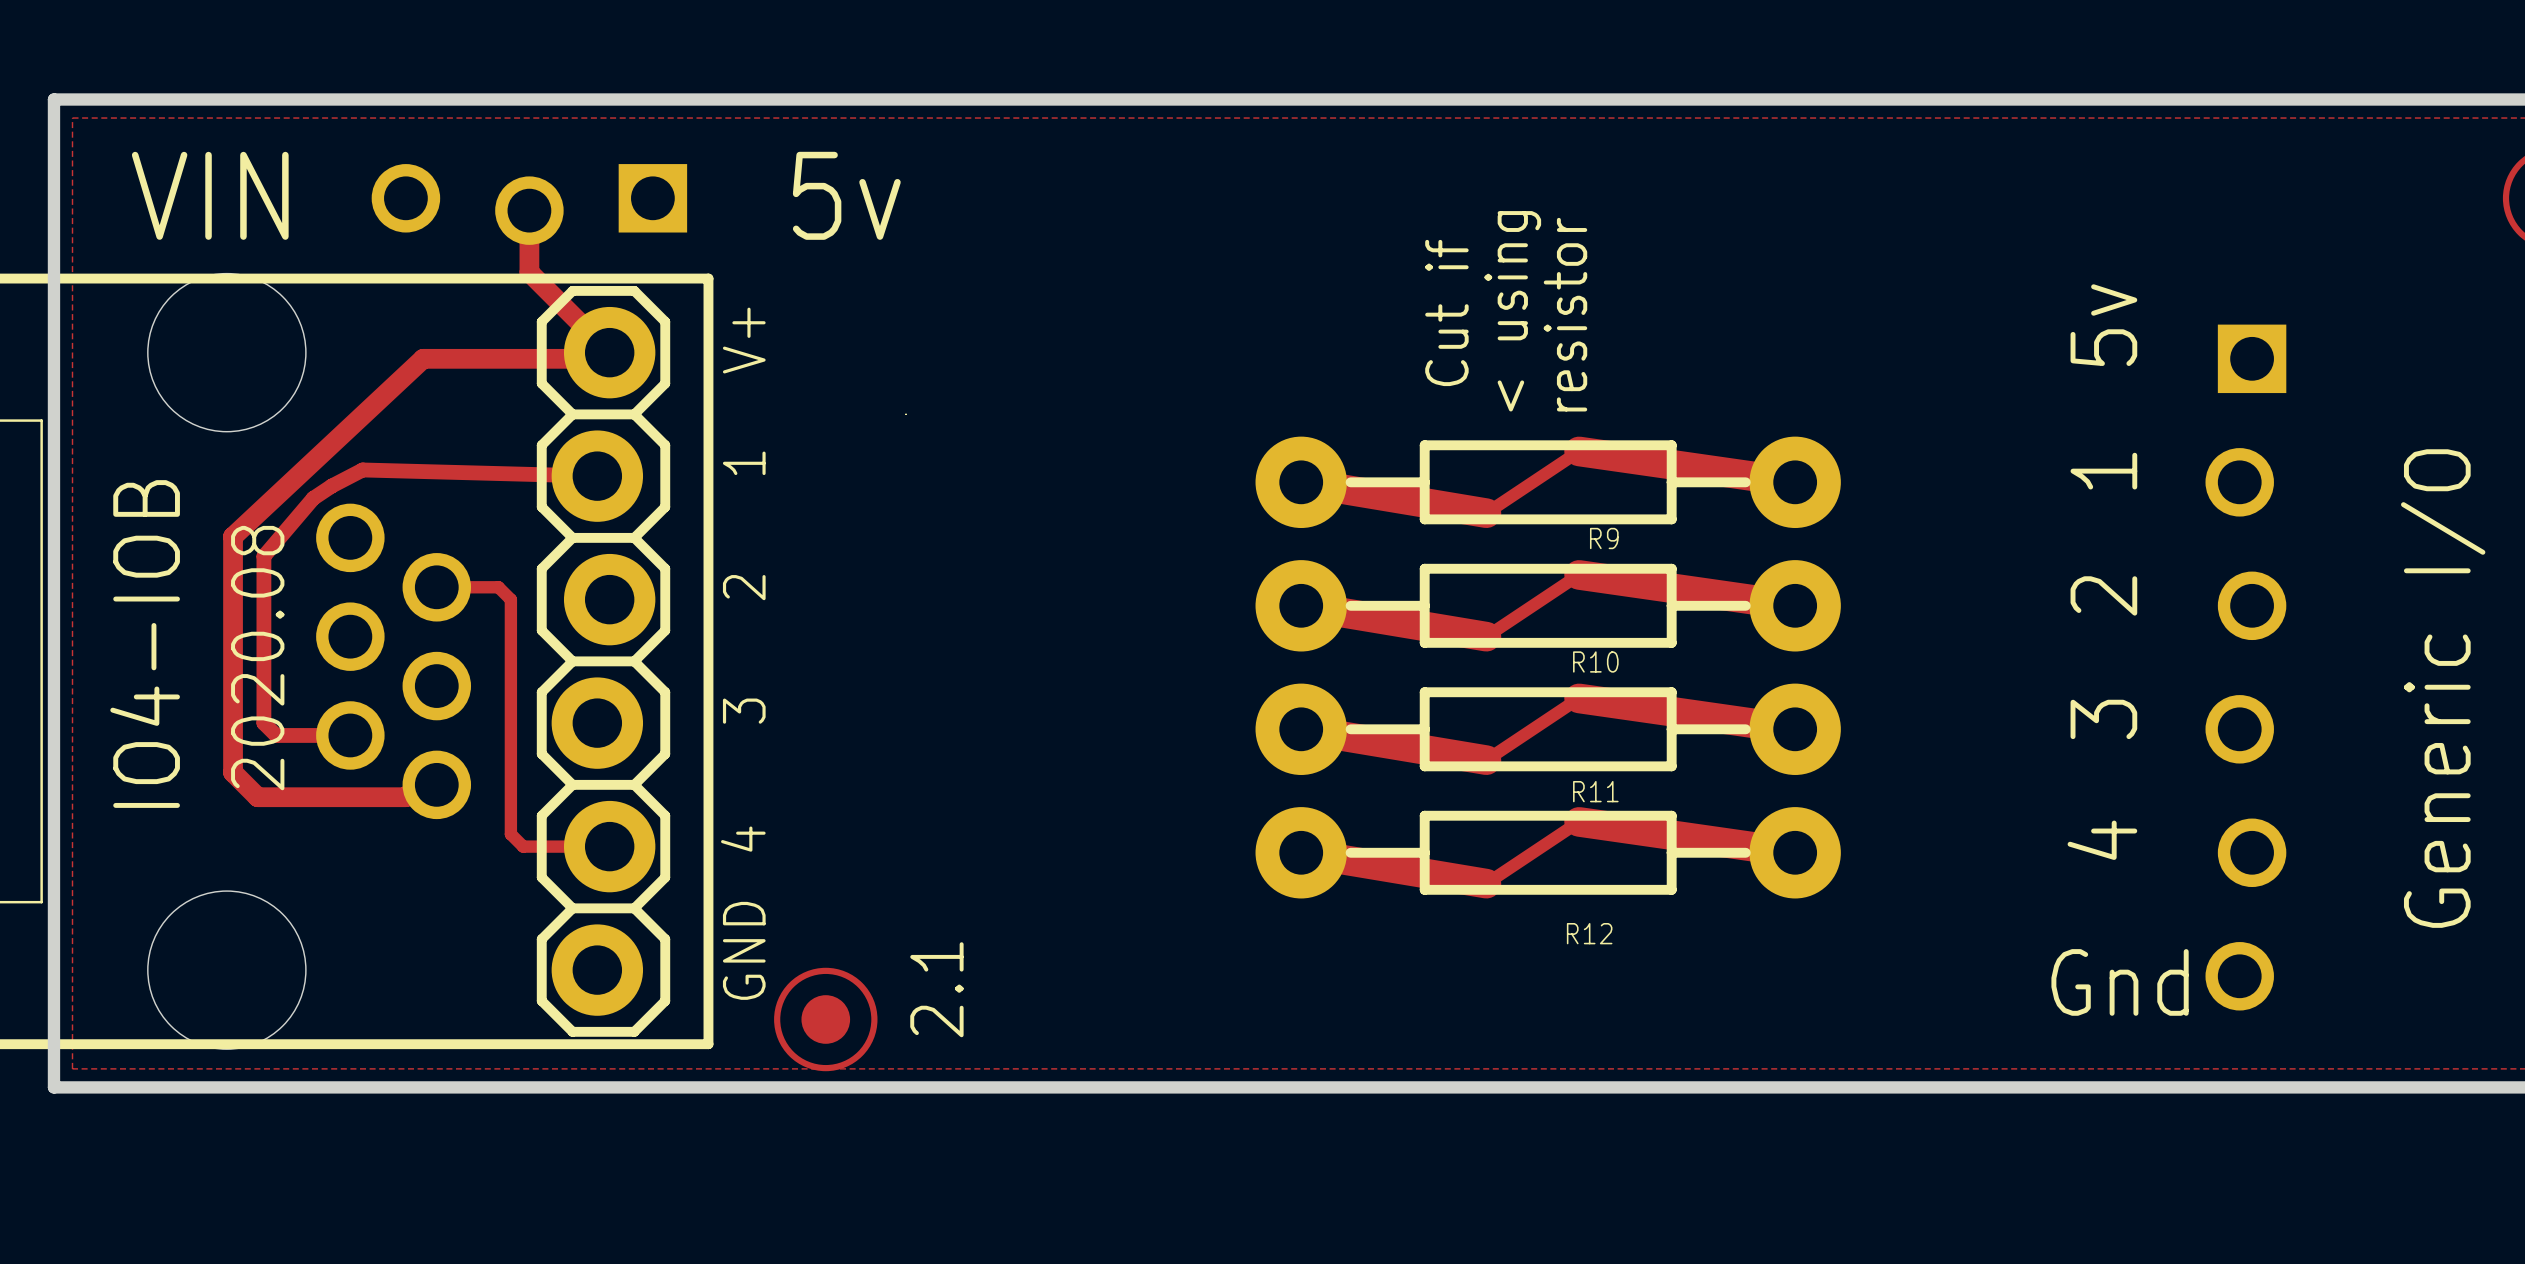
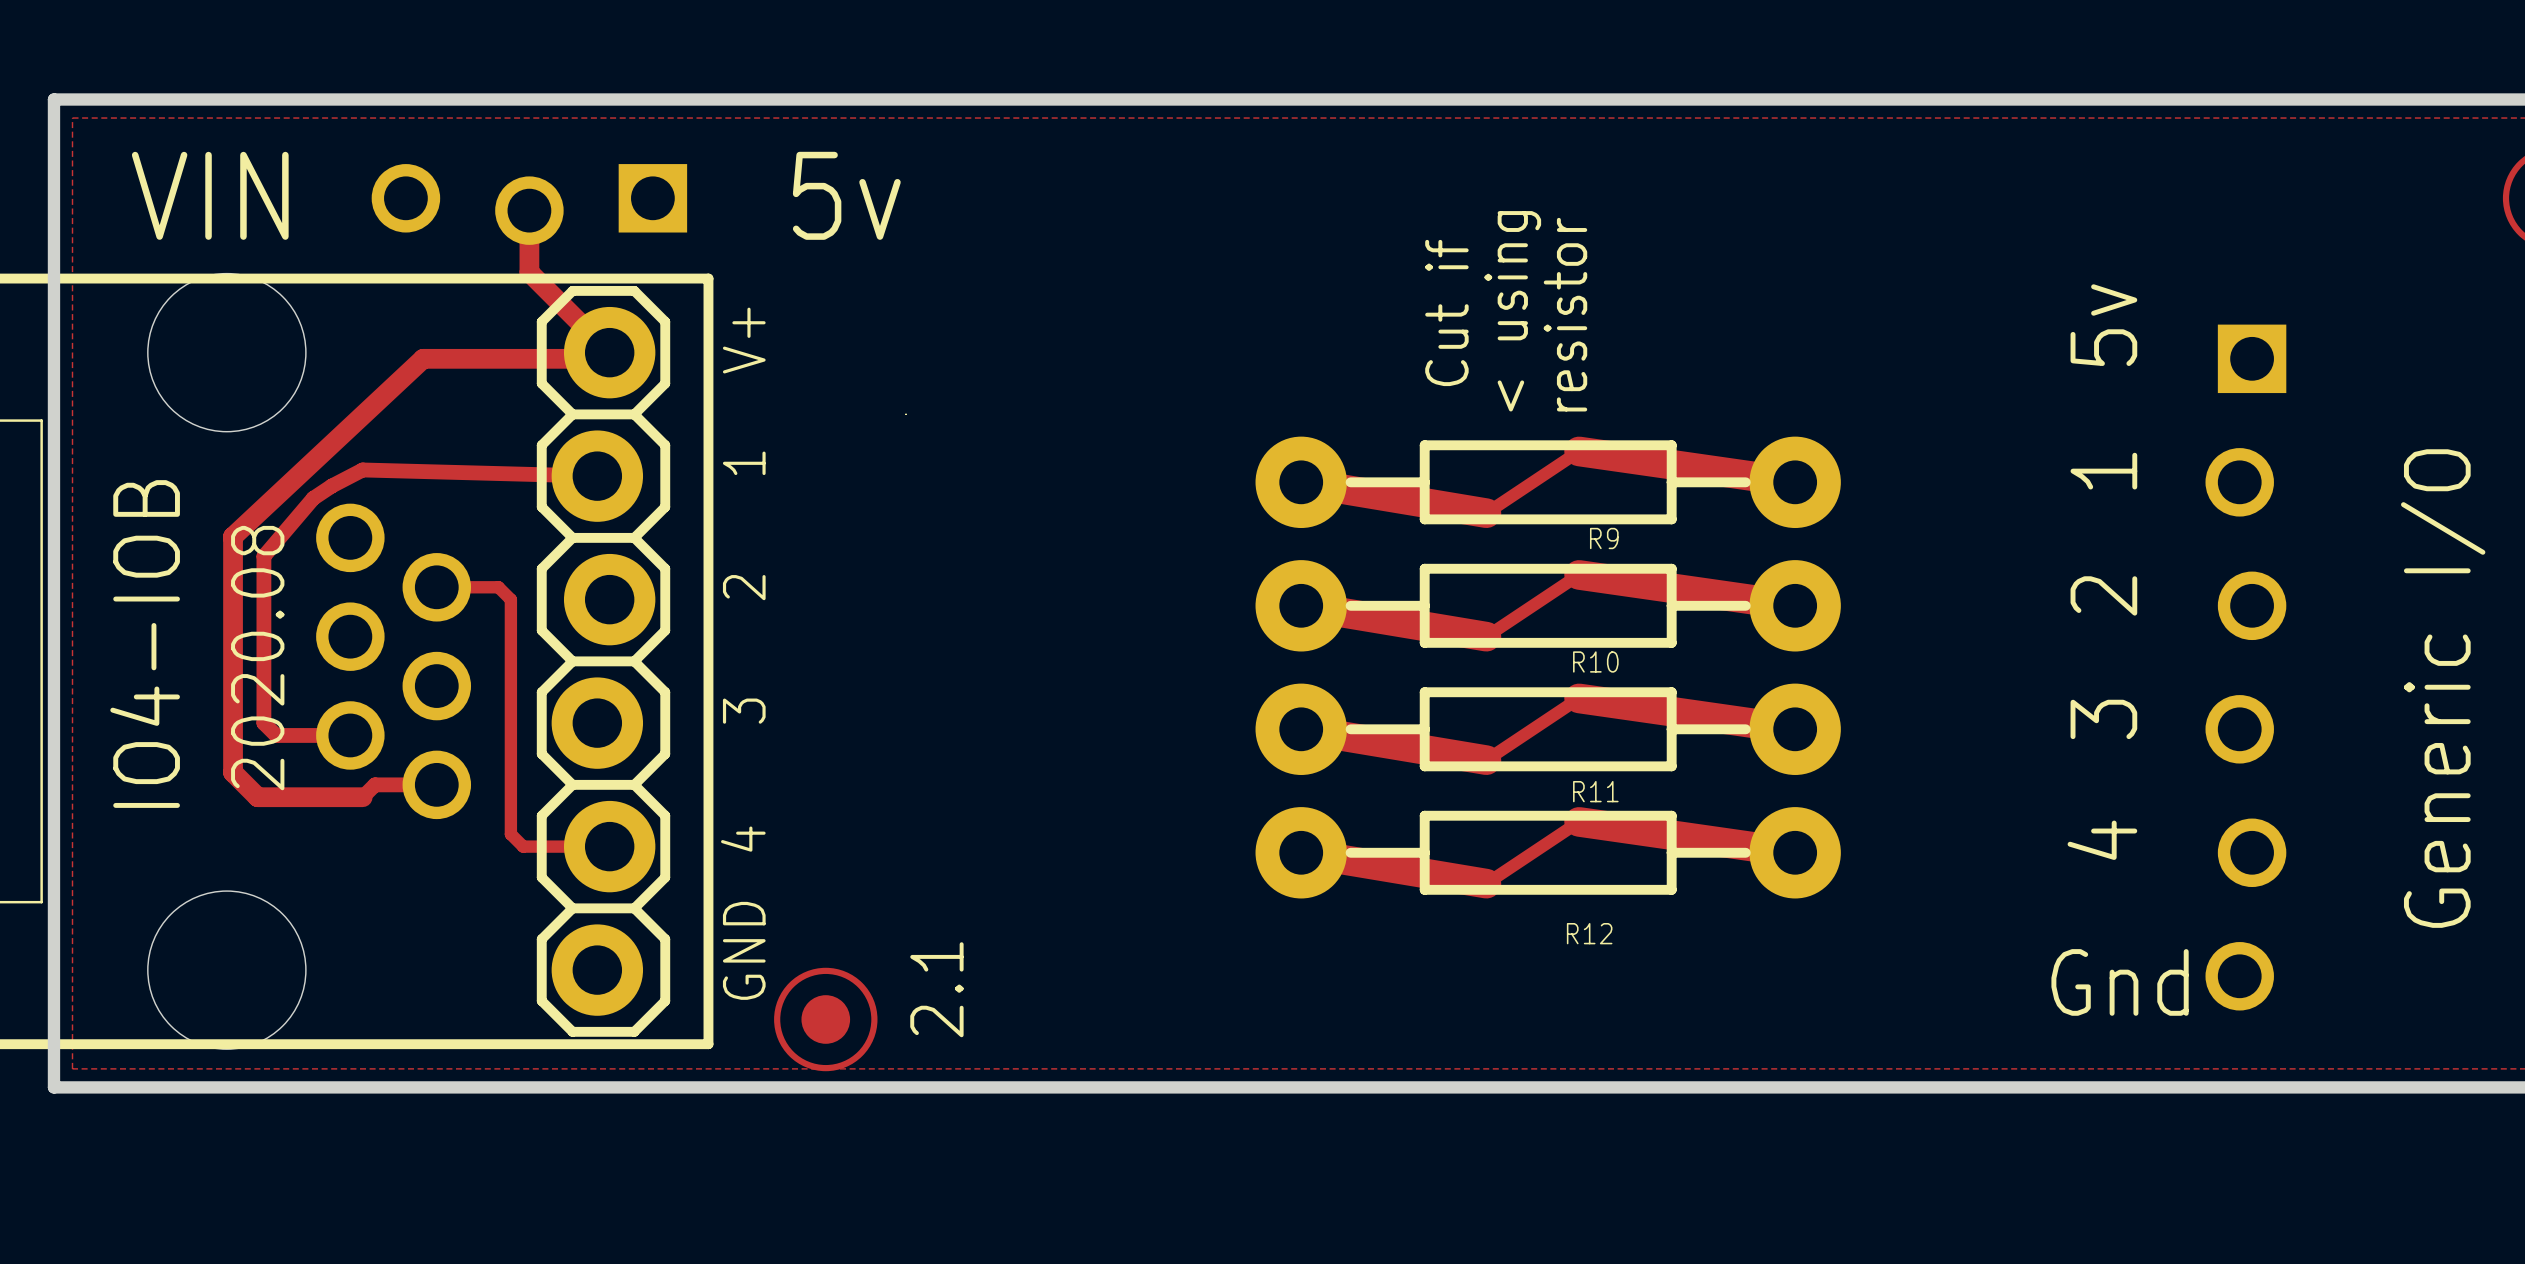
track: (418, 784) (405, 797) (362, 797) -> (418, 784) (375, 784) (362, 797)

